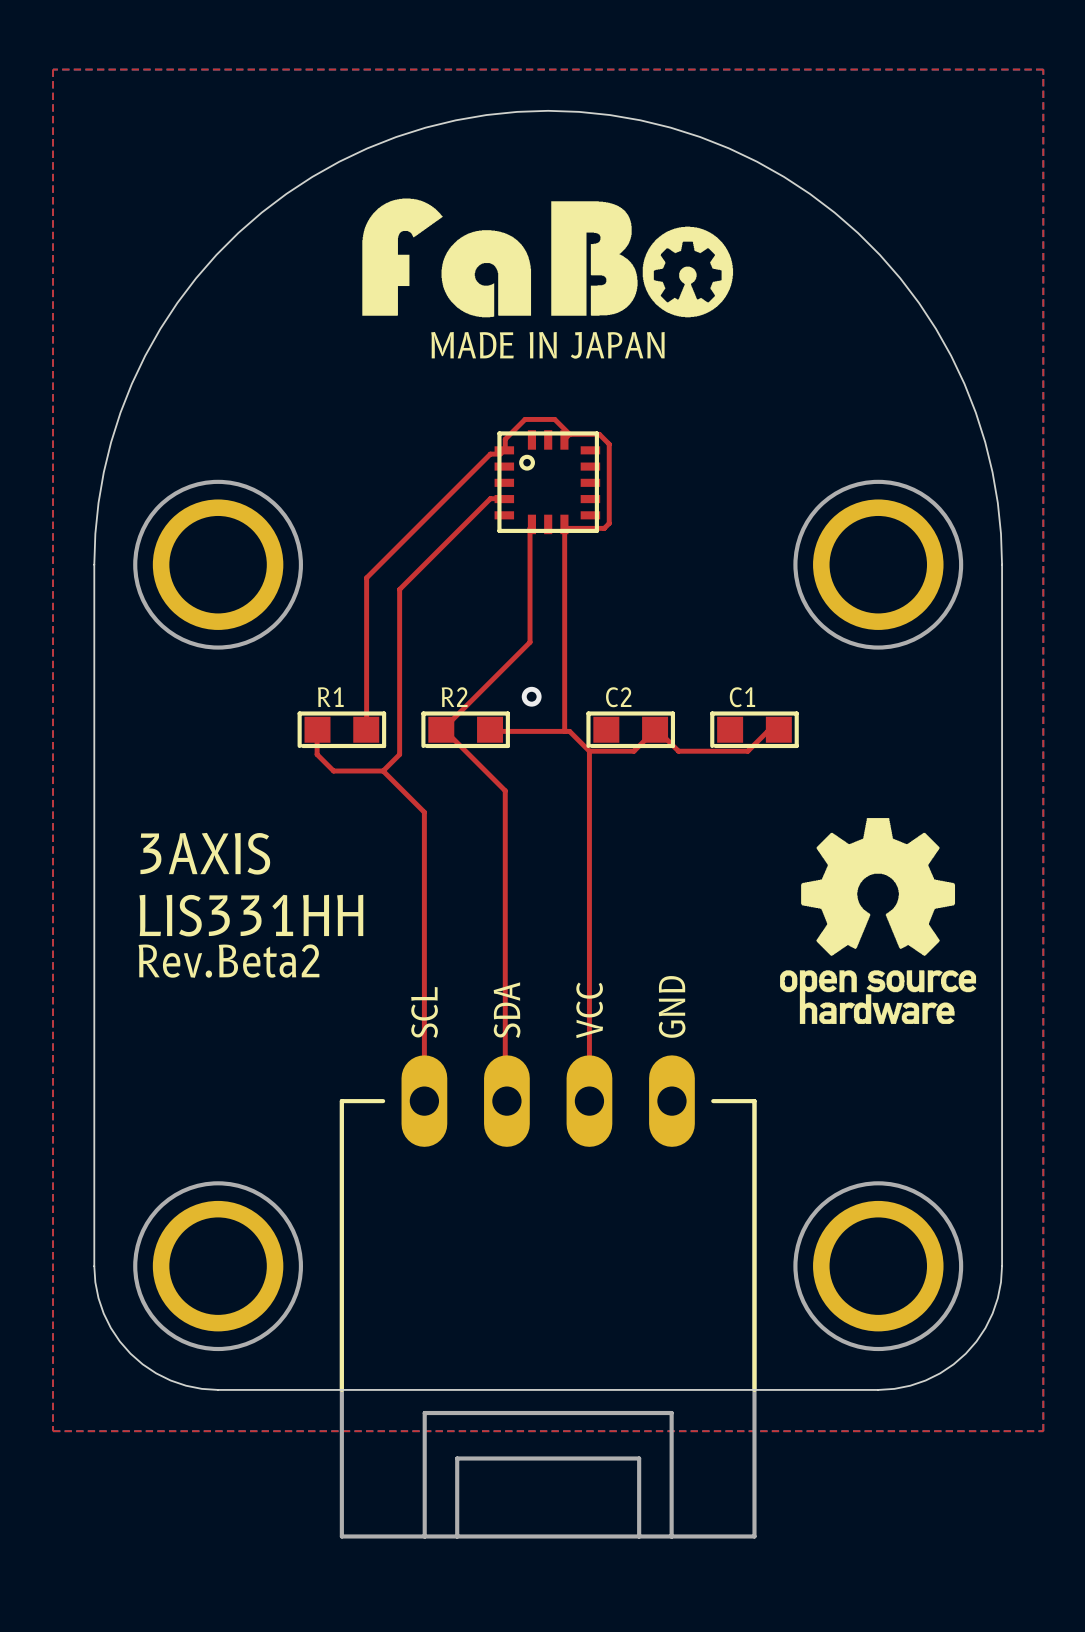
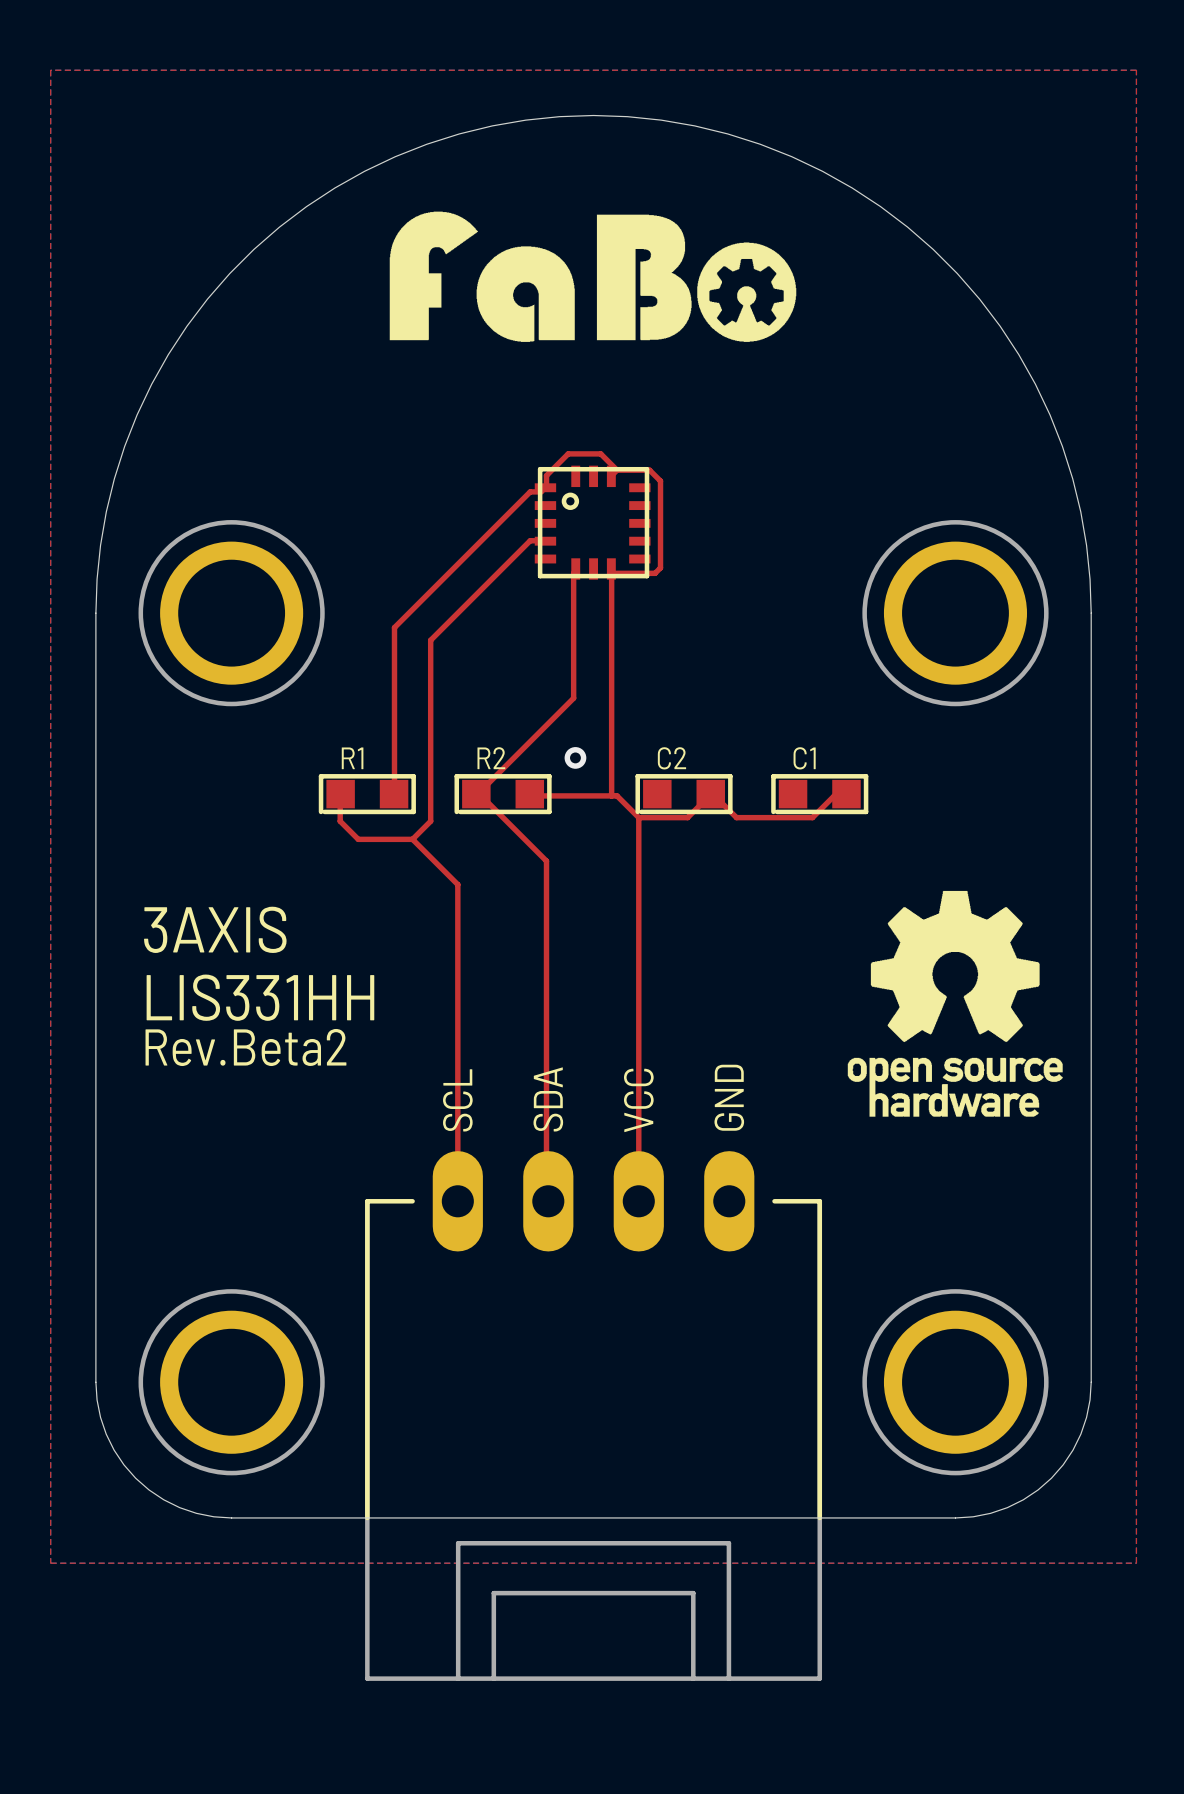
text: MADE IN JAPAN (547, 345) -> none

